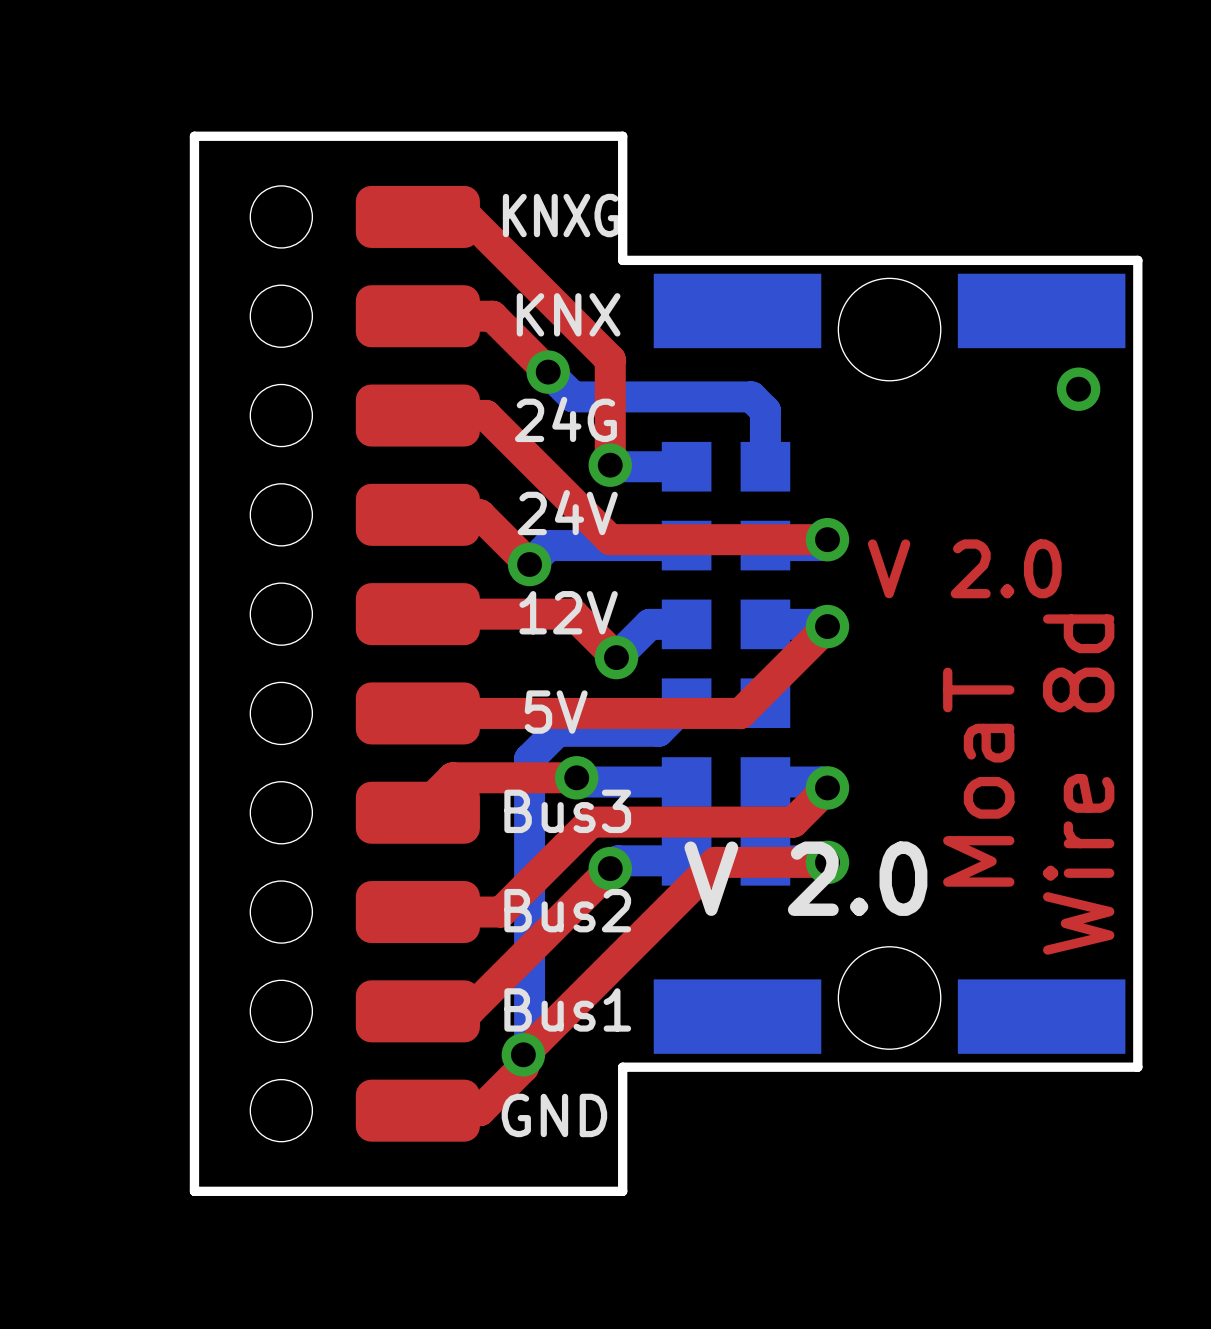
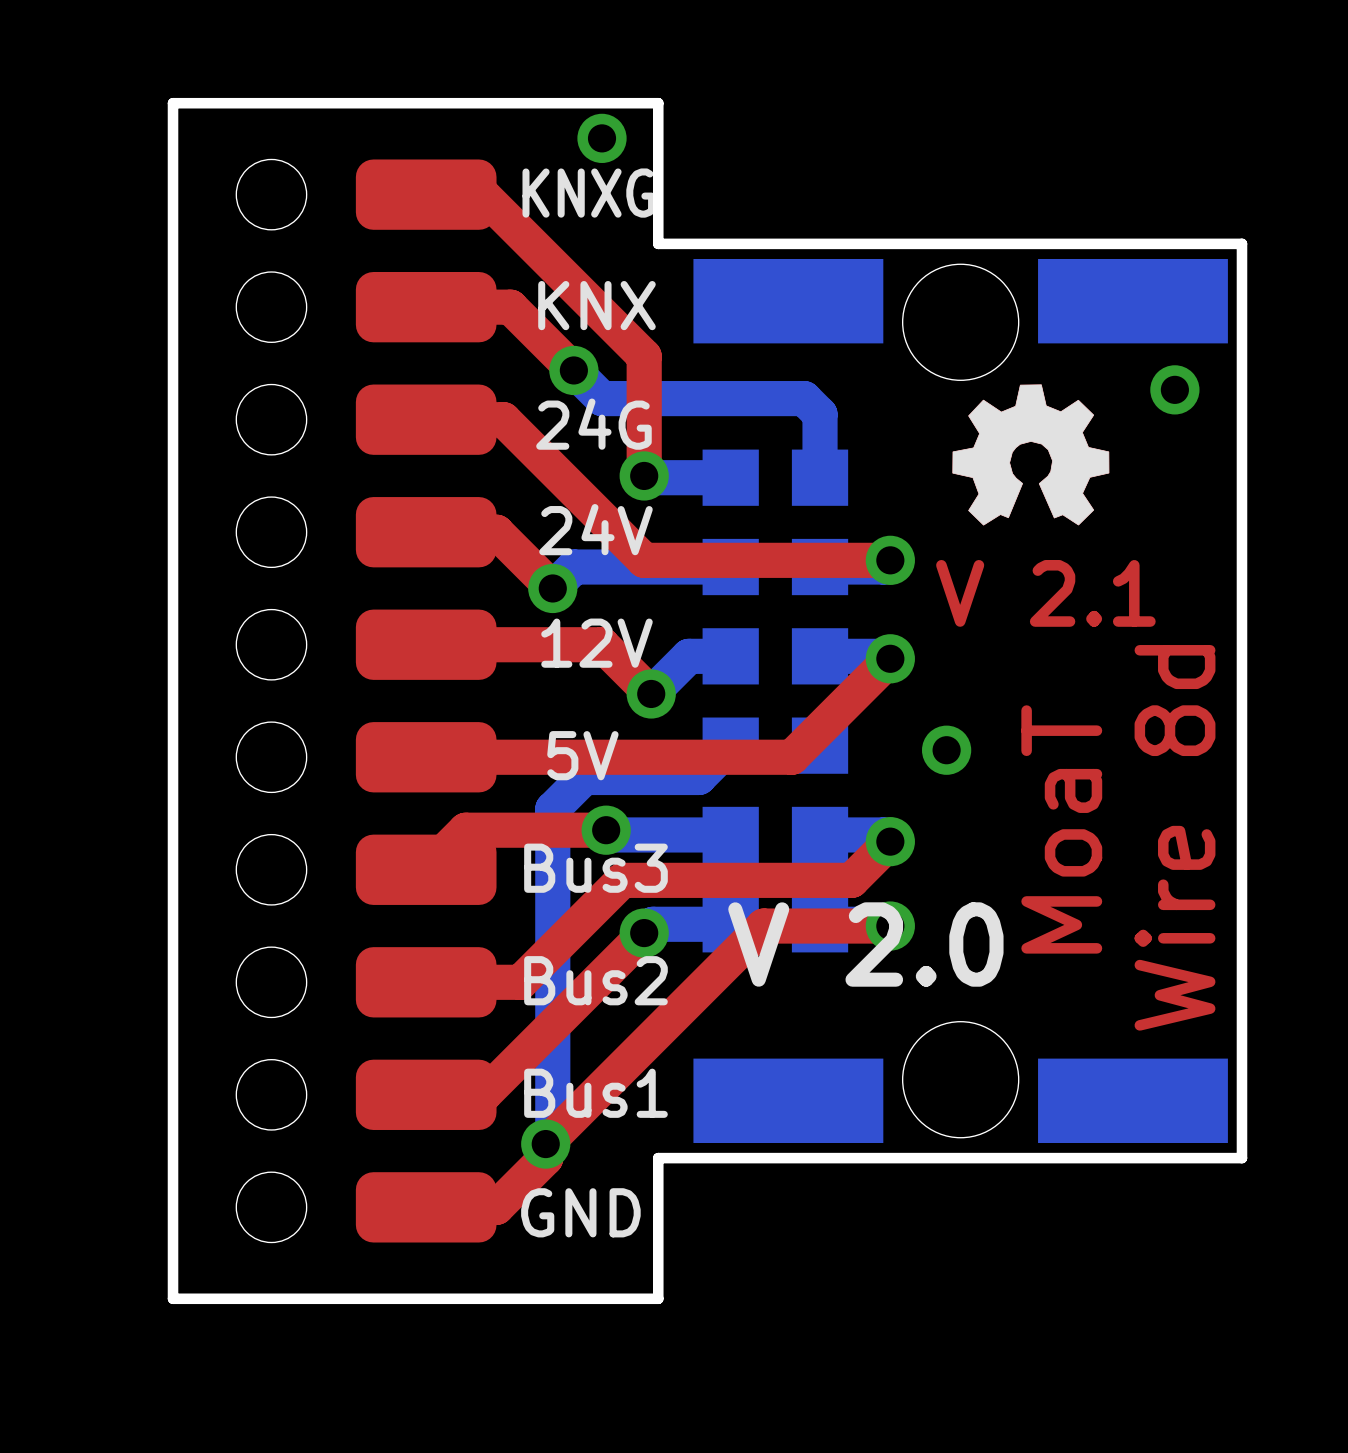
via: none -> (602, 138)
drawing: none -> [952, 384, 1110, 526]
text: V 2.0 (964, 568) -> V 2.1 (1045, 593)
via: none -> (946, 750)

